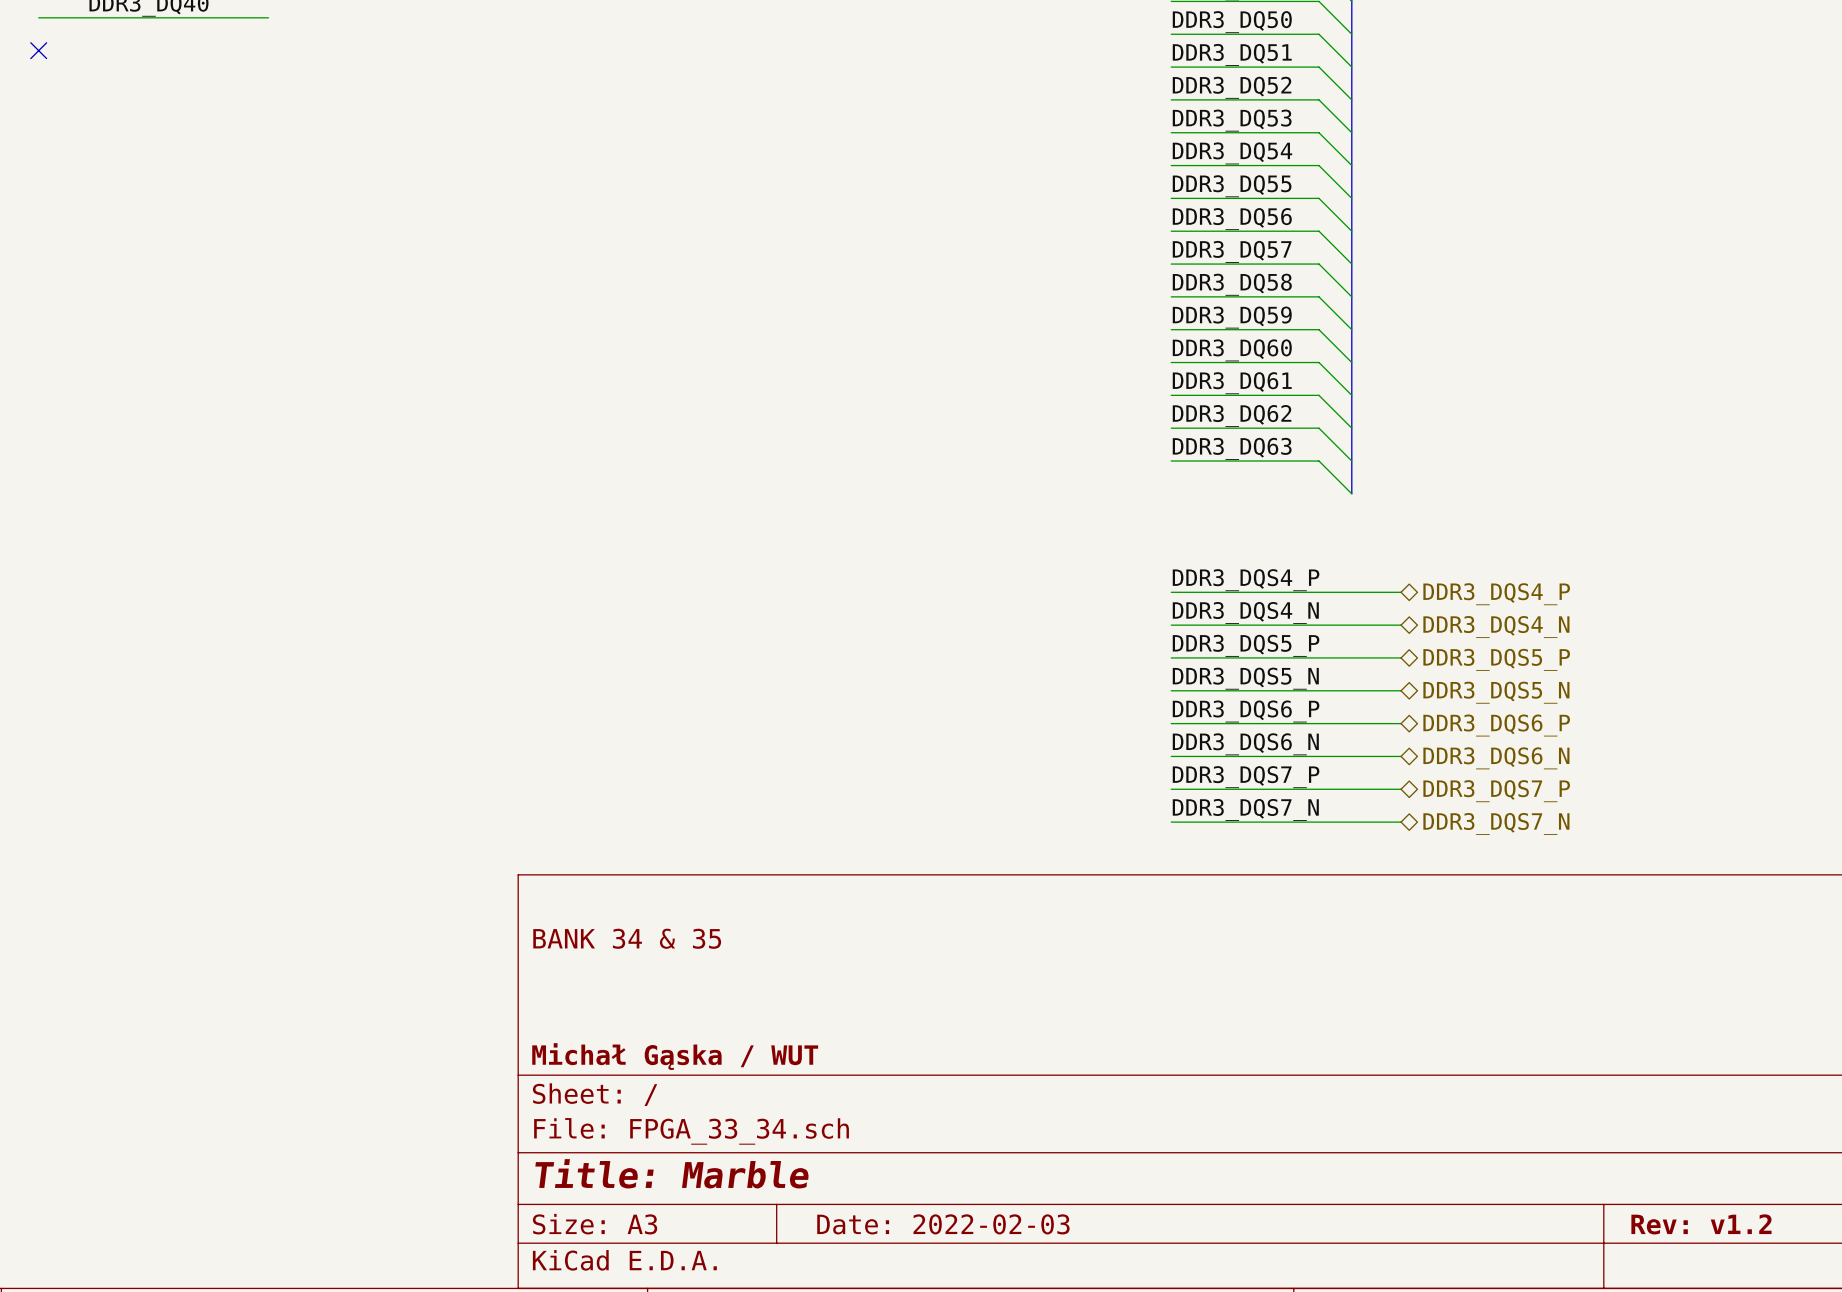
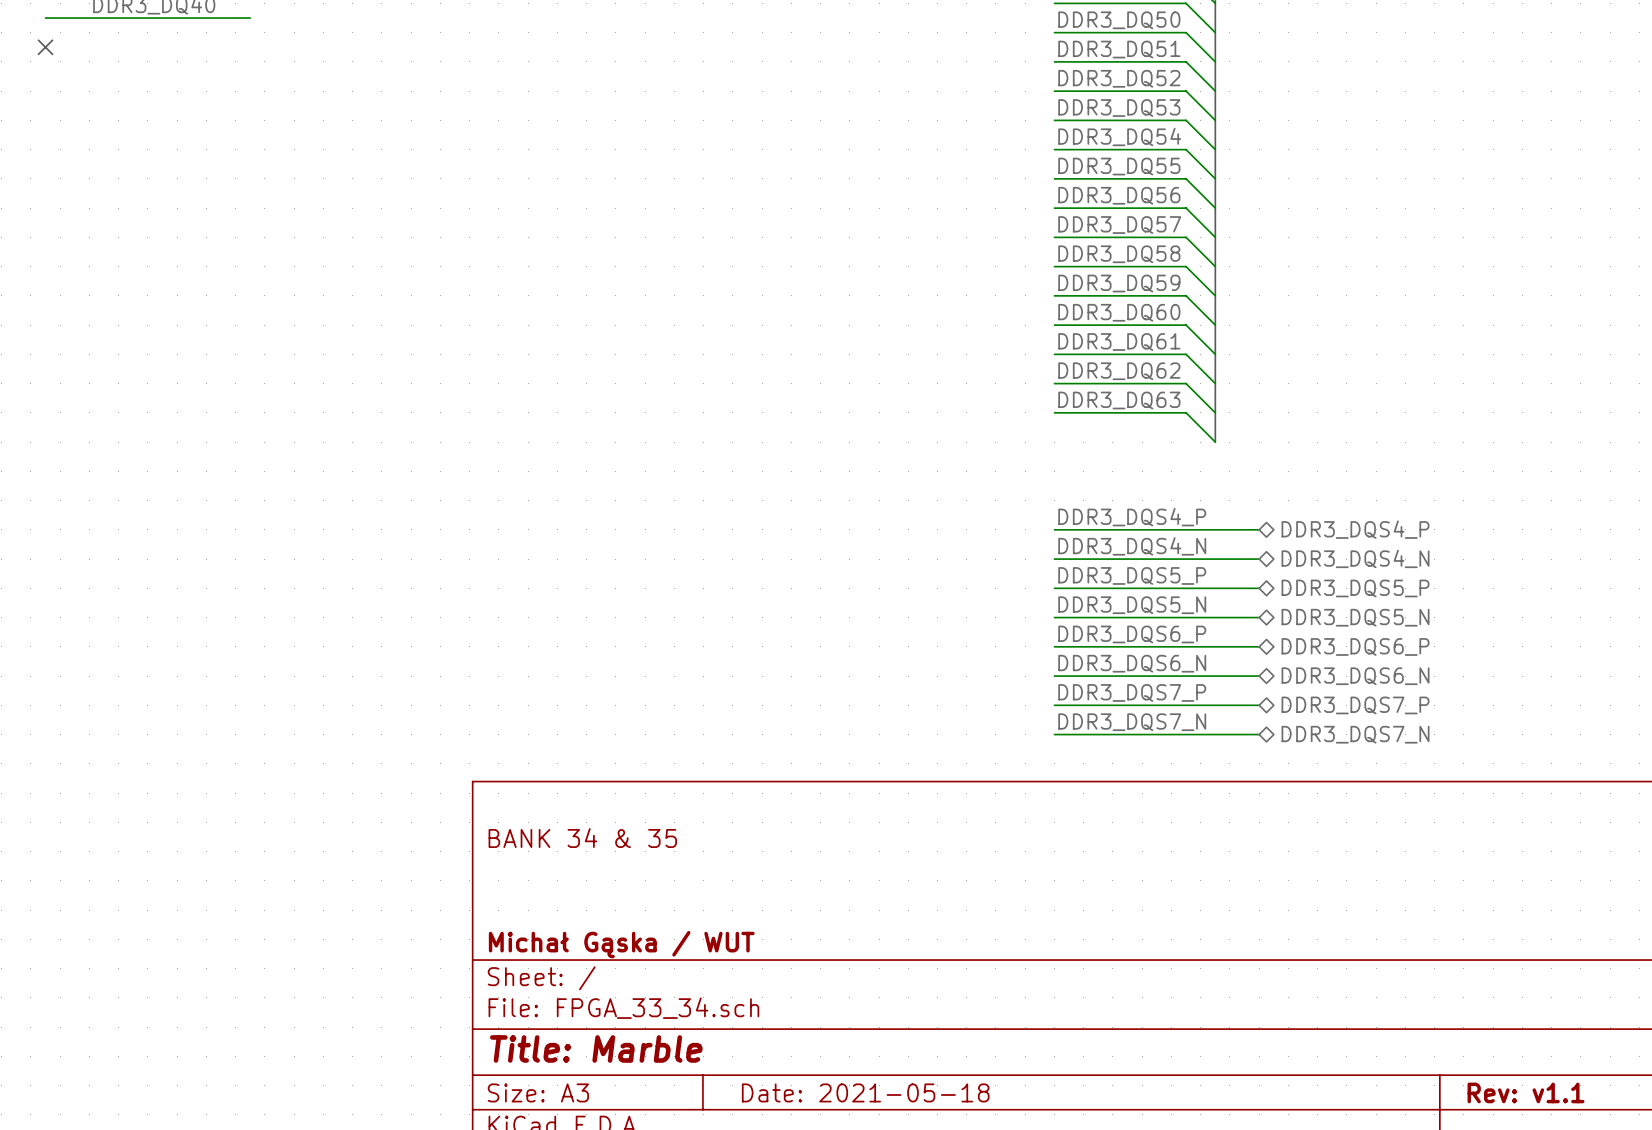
title block: Date: 2022-02-03 (943, 1224) -> Date: 2021-05-18 (865, 1092)
title block: Rev: v1.2 (1701, 1224) -> Rev: v1.1 (1526, 1092)

